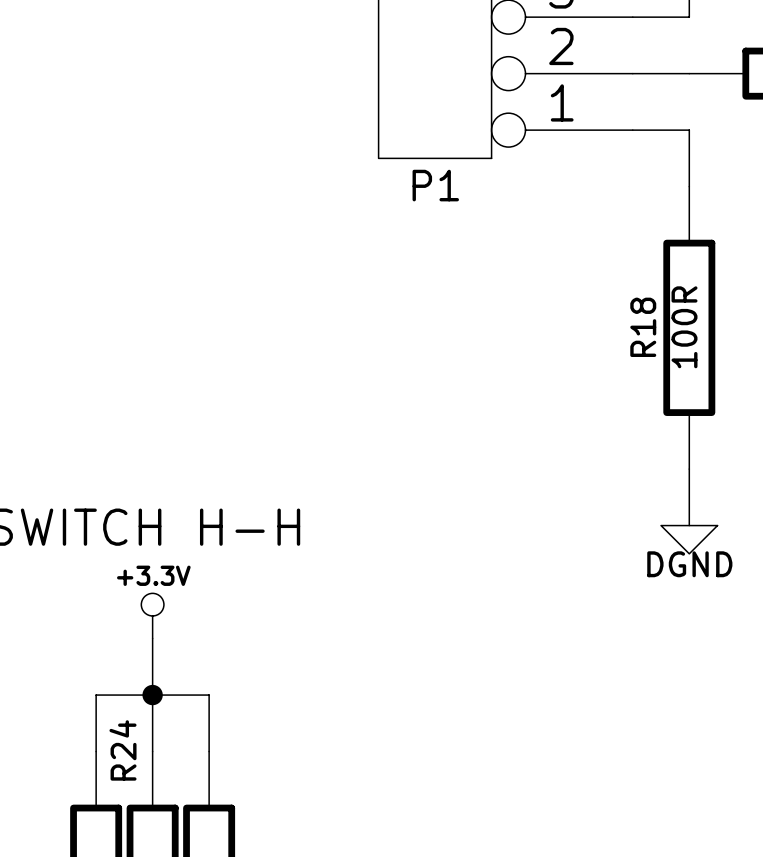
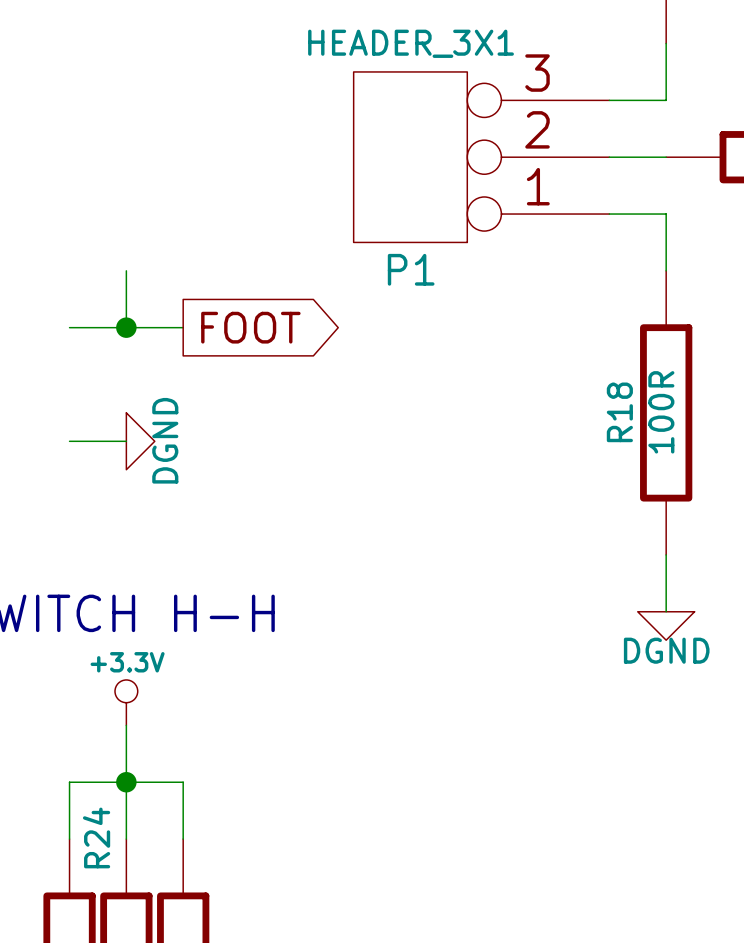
wire: none -> (126, 270) (126, 327)
wire: none -> (69, 327) (183, 327)
junction: none -> (126, 327)
global label: none -> FOOT (250, 327)
wire: none -> (69, 441) (126, 441)
power symbol: none -> DGND (140, 441)

